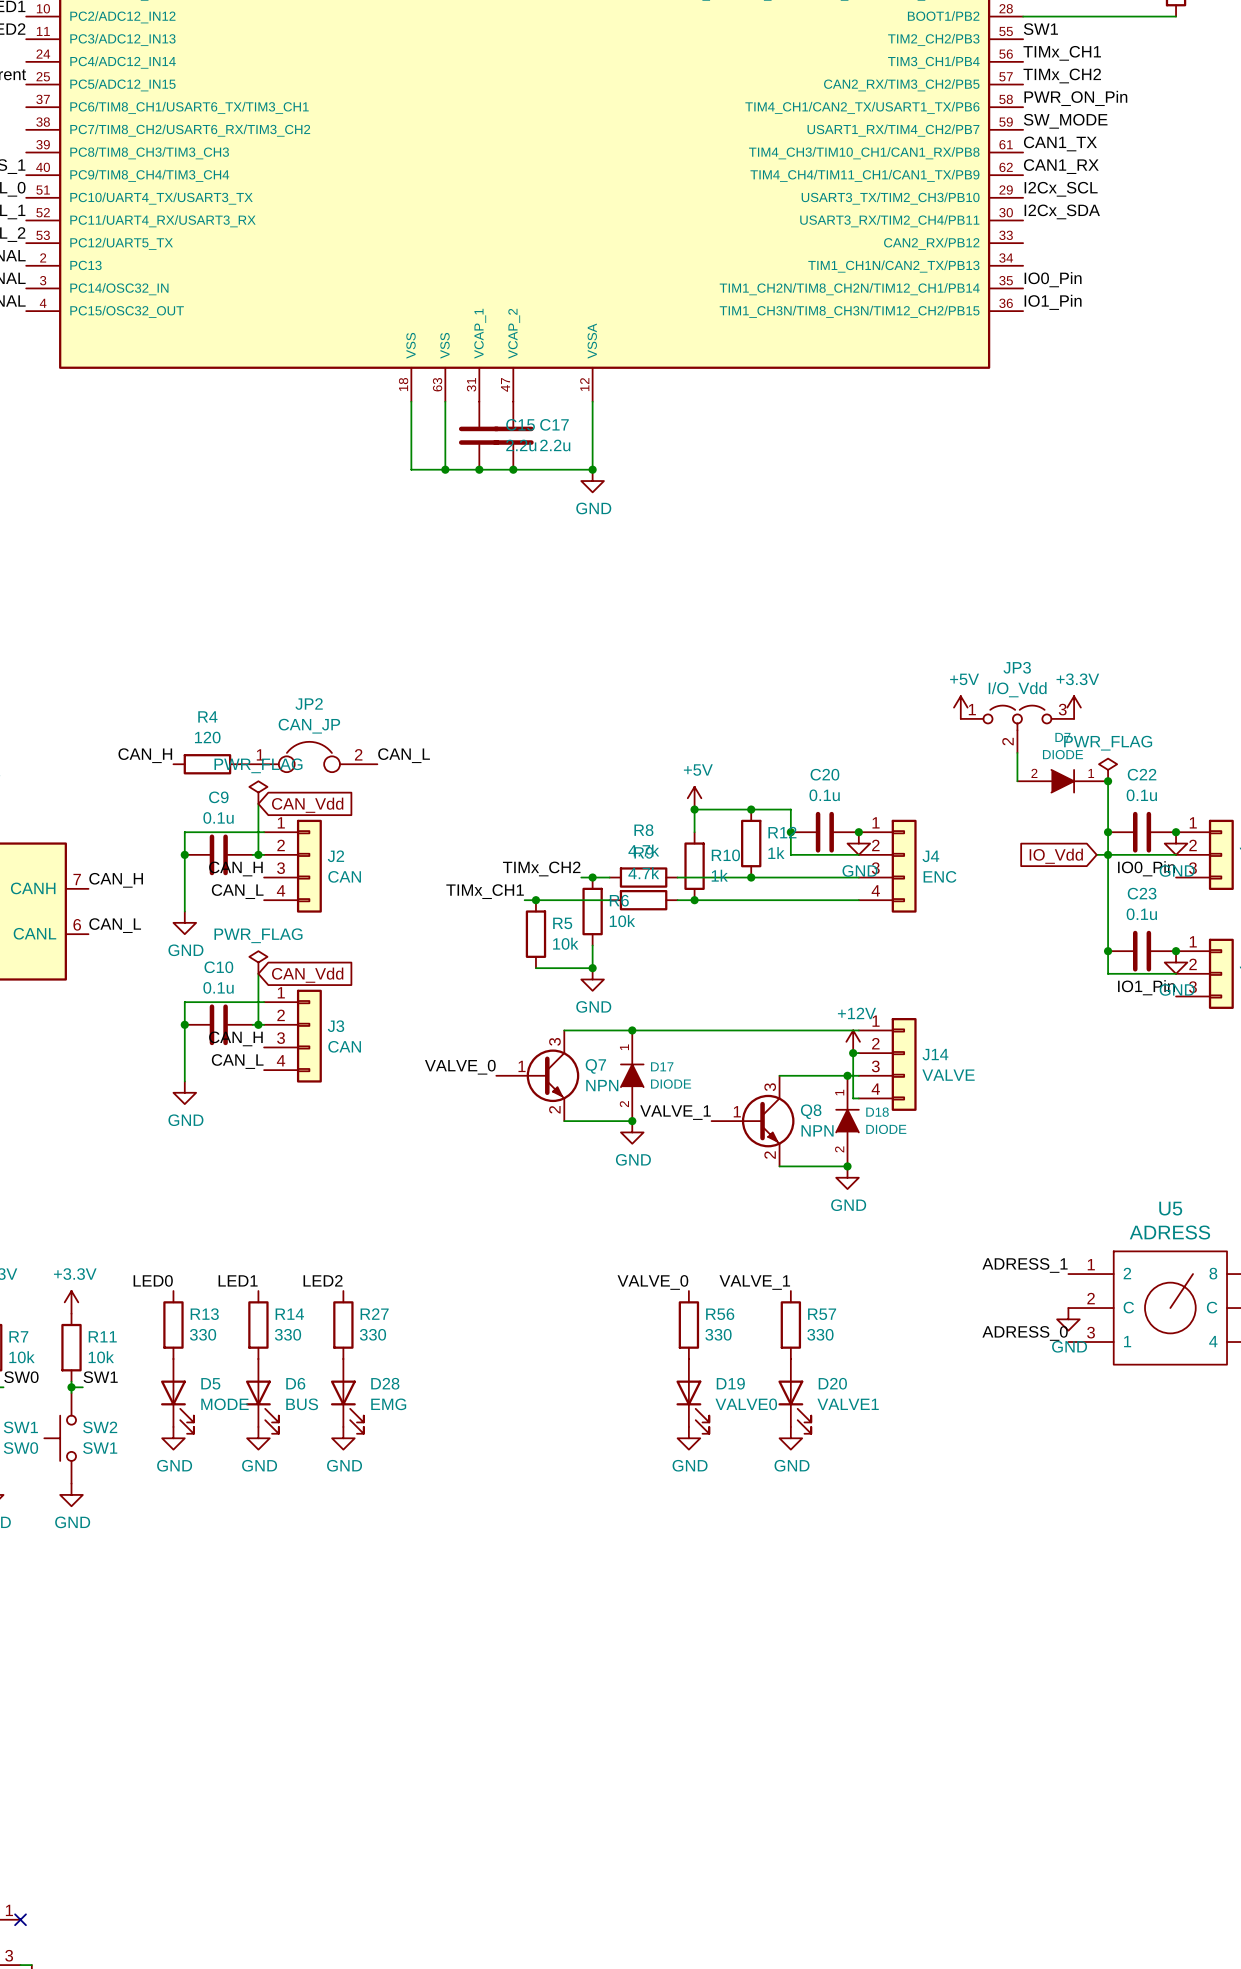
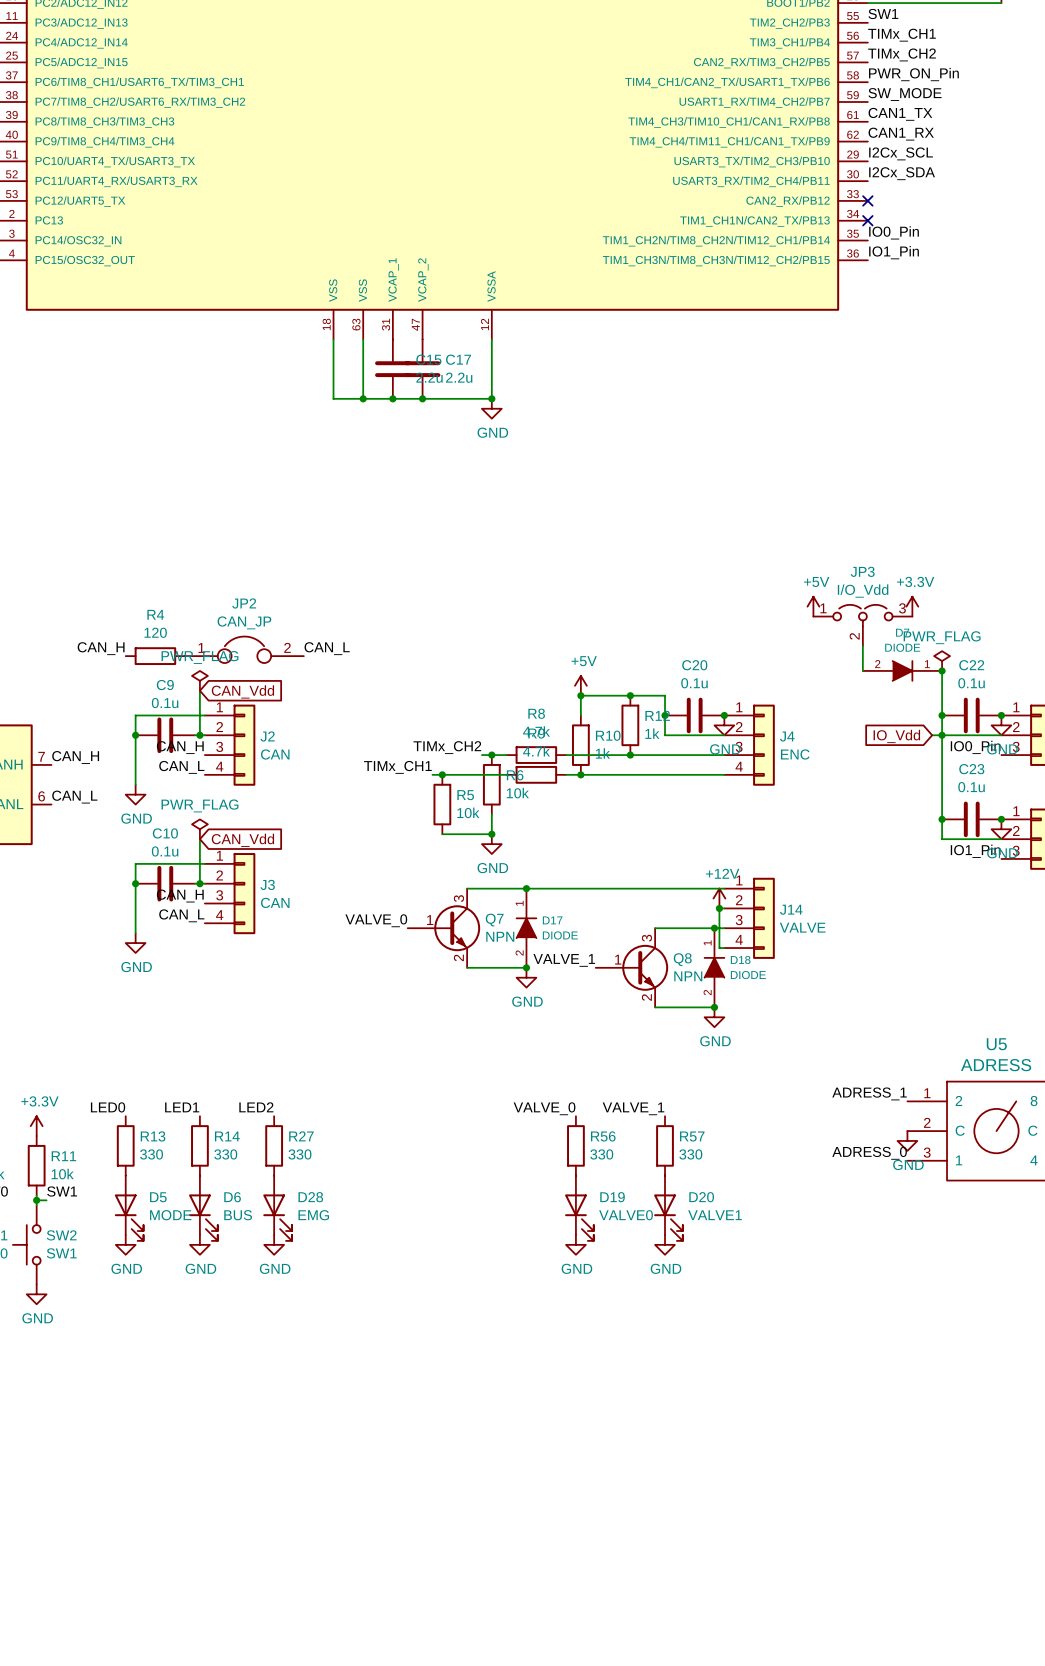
no-connect mark: none -> (867, 200)
no-connect mark: none -> (867, 220)

